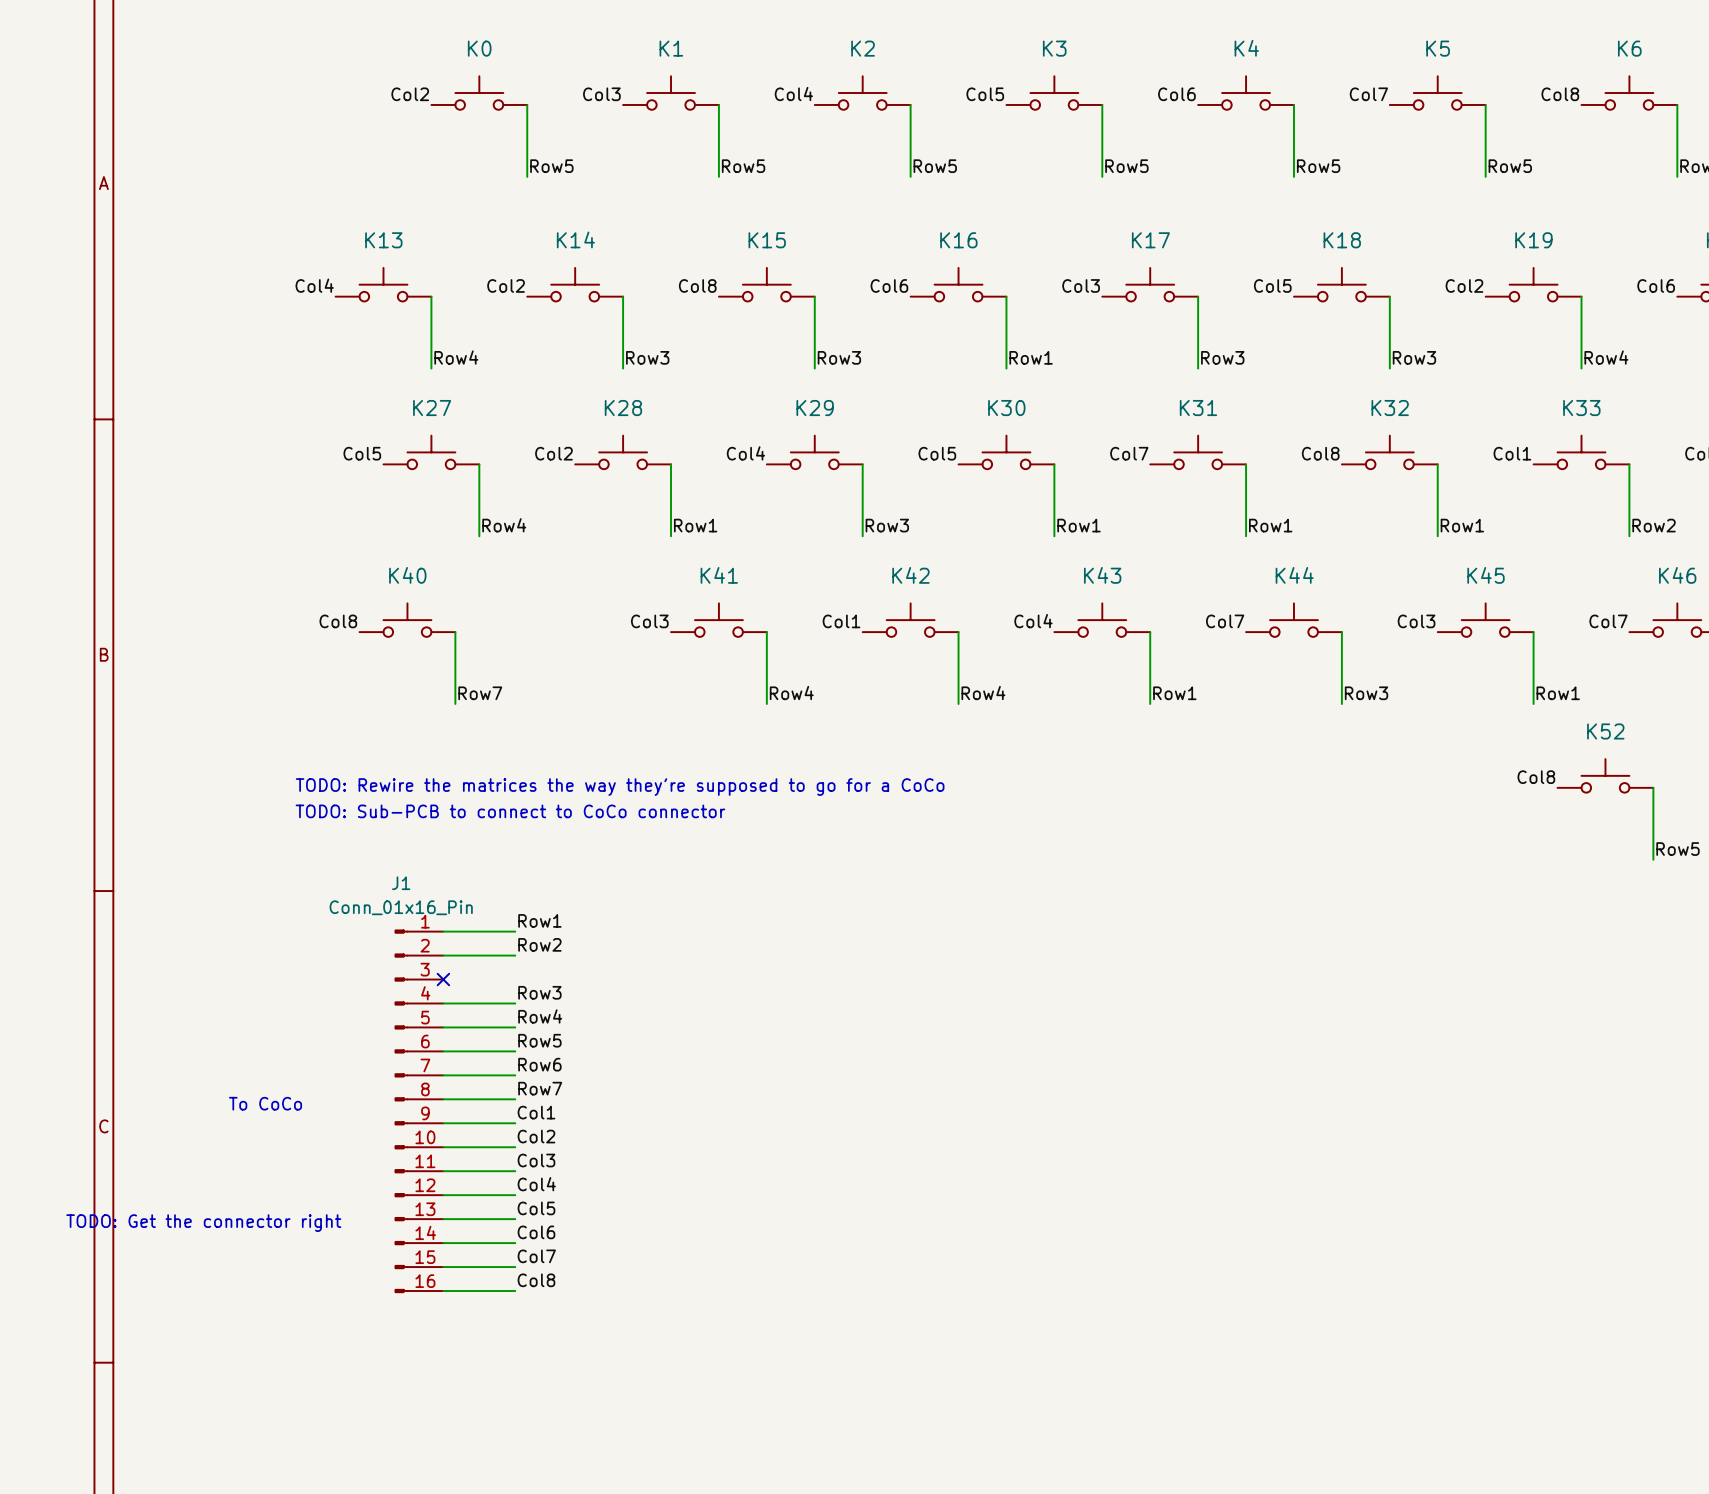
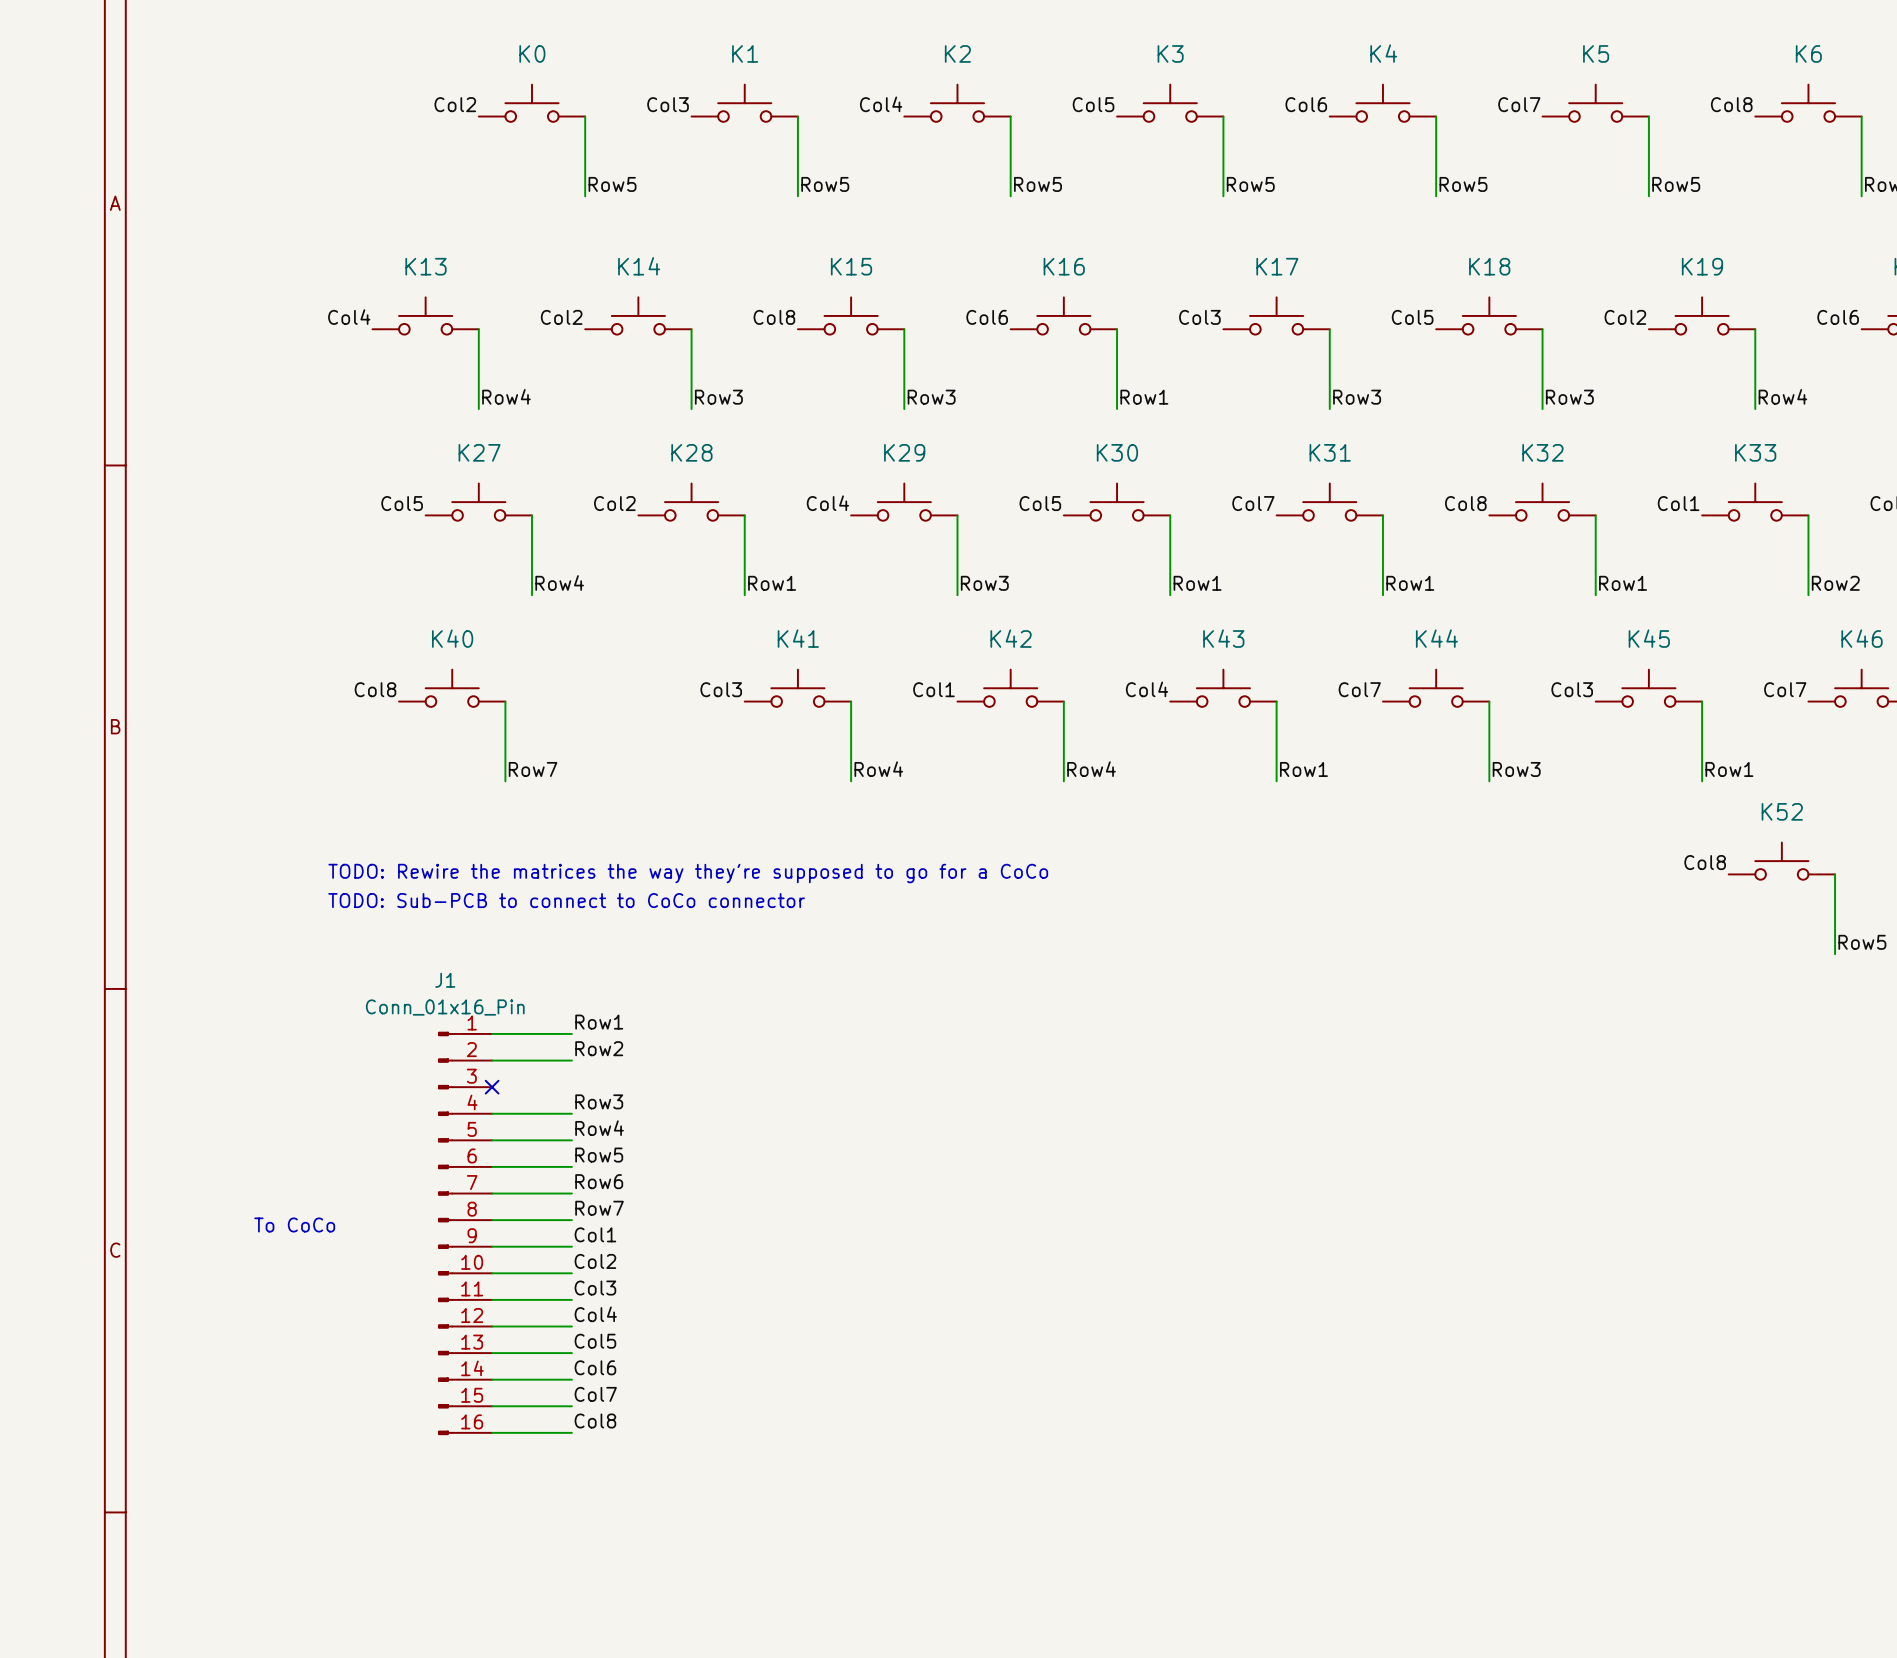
text: TODO: Get the connector right (203, 1223) -> none

